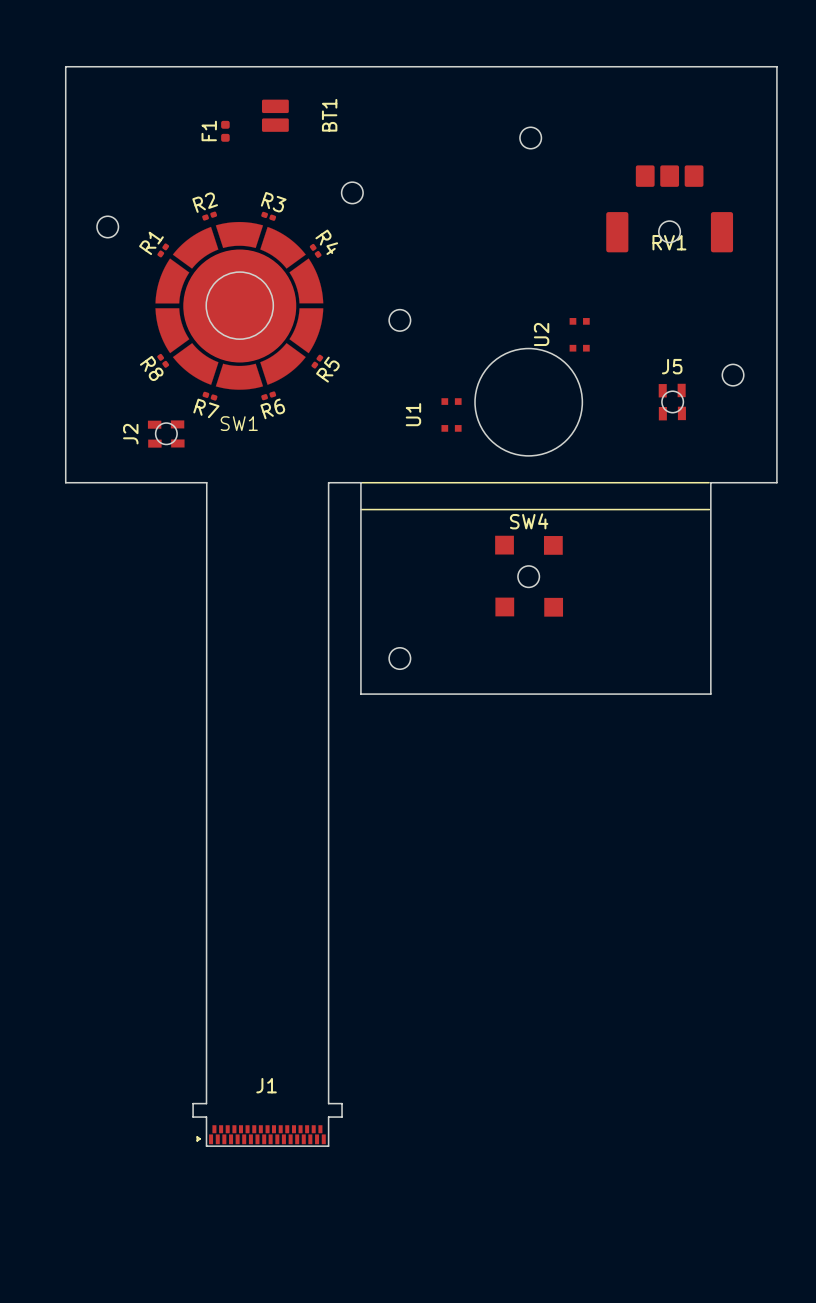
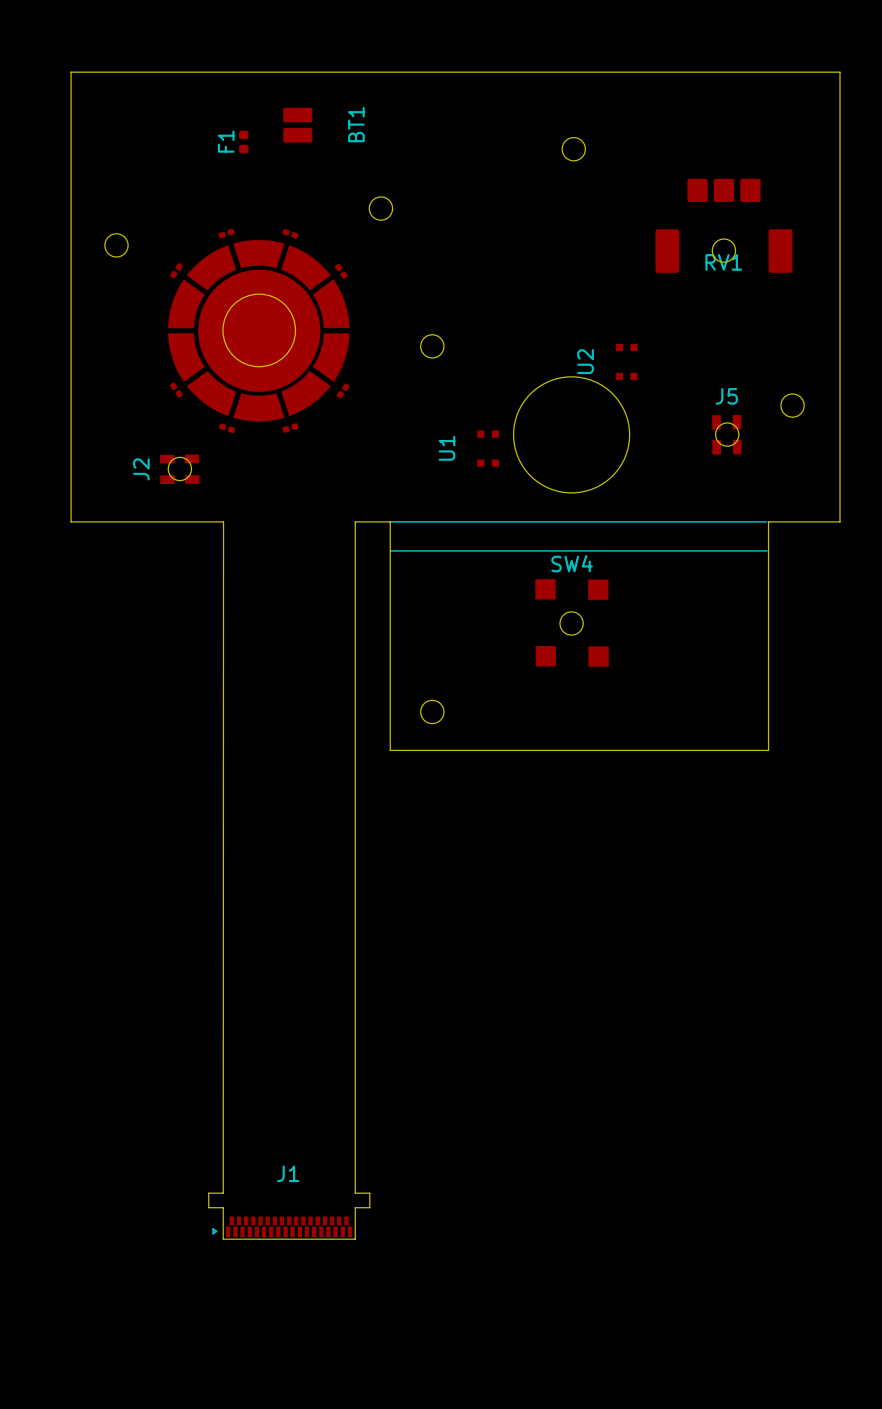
R2 name: R2 (205, 202) -> none
R3 name: R3 (273, 202) -> none
R4 name: R4 (326, 242) -> none
R1 name: R1 (151, 243) -> none
R8 name: R8 (151, 368) -> none
R5 name: R5 (327, 369) -> none
R7 name: R7 (206, 408) -> none
R6 name: R6 (272, 408) -> none
SW1 name: SW1 (239, 423) -> none

